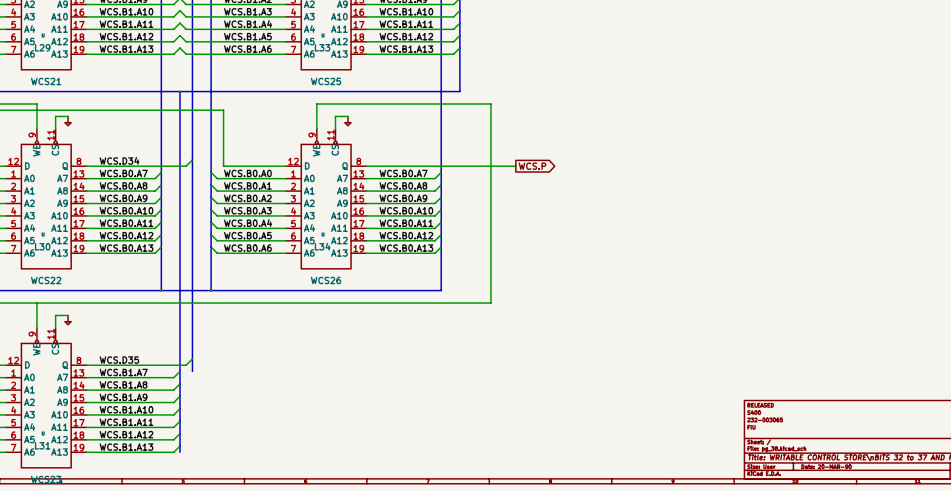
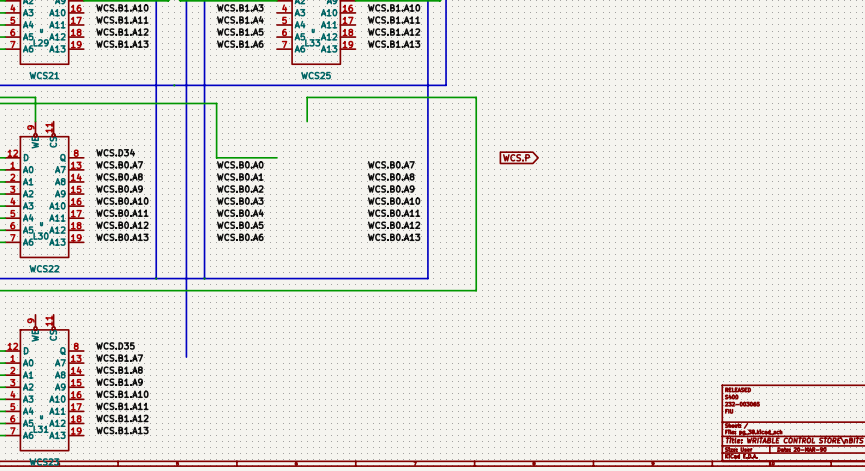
wire: (459, 10) (453, 16) (366, 16) -> none
wire: (86, 16) (173, 16) (180, 10) (186, 16) (285, 16) -> none
wire: (459, 23) (453, 29) (366, 29) -> none
wire: (86, 29) (173, 29) (180, 23) (186, 29) (285, 29) -> none
wire: (459, 35) (453, 41) (366, 41) -> none
wire: (86, 41) (173, 41) (180, 35) (186, 41) (285, 41) -> none
wire: (459, 48) (453, 54) (366, 54) -> none
wire: (86, 54) (173, 54) (180, 48) (186, 54) (285, 54) -> none
bus: (180, 91) (180, 452) -> none
wire: (68, 116) (55, 116) (55, 128) -> none
wire: (347, 116) (335, 116) (335, 128) -> none
power symbol: (68, 121) -> none
power symbol: (347, 121) -> none
wire: (192, 159) (186, 166) (86, 166) -> none
wire: (366, 166) (515, 166) -> none
wire: (161, 172) (155, 178) (86, 178) -> none
wire: (211, 172) (217, 178) (285, 178) -> none
wire: (441, 172) (435, 178) (366, 178) -> none
wire: (161, 184) (155, 191) (86, 191) -> none
wire: (211, 184) (217, 191) (285, 191) -> none
wire: (441, 184) (435, 191) (366, 191) -> none
wire: (161, 197) (155, 203) (86, 203) -> none
wire: (211, 197) (217, 203) (285, 203) -> none
wire: (441, 197) (435, 203) (366, 203) -> none
part: (326, 198) -> none
wire: (161, 209) (155, 215) (86, 215) -> none
wire: (211, 209) (217, 215) (285, 215) -> none
wire: (441, 209) (435, 215) (366, 215) -> none
wire: (161, 222) (155, 228) (86, 228) -> none
wire: (211, 222) (217, 228) (285, 228) -> none
wire: (441, 222) (435, 228) (366, 228) -> none
wire: (161, 234) (155, 240) (86, 240) -> none
wire: (211, 234) (217, 240) (285, 240) -> none
wire: (441, 234) (435, 240) (366, 240) -> none
wire: (161, 247) (155, 253) (86, 253) -> none
wire: (211, 247) (217, 253) (285, 253) -> none
wire: (441, 247) (435, 253) (366, 253) -> none
wire: (36, 303) (36, 327) -> none
wire: (68, 315) (55, 315) (55, 327) -> none
power symbol: (68, 320) -> none
wire: (192, 359) (186, 365) (86, 365) -> none
wire: (180, 371) (173, 377) (86, 377) -> none
wire: (180, 383) (173, 390) (86, 390) -> none
wire: (180, 396) (173, 402) (86, 402) -> none
wire: (180, 408) (173, 414) (86, 414) -> none
wire: (180, 421) (173, 427) (86, 427) -> none
wire: (180, 433) (173, 439) (86, 439) -> none
wire: (180, 446) (173, 452) (86, 452) -> none

